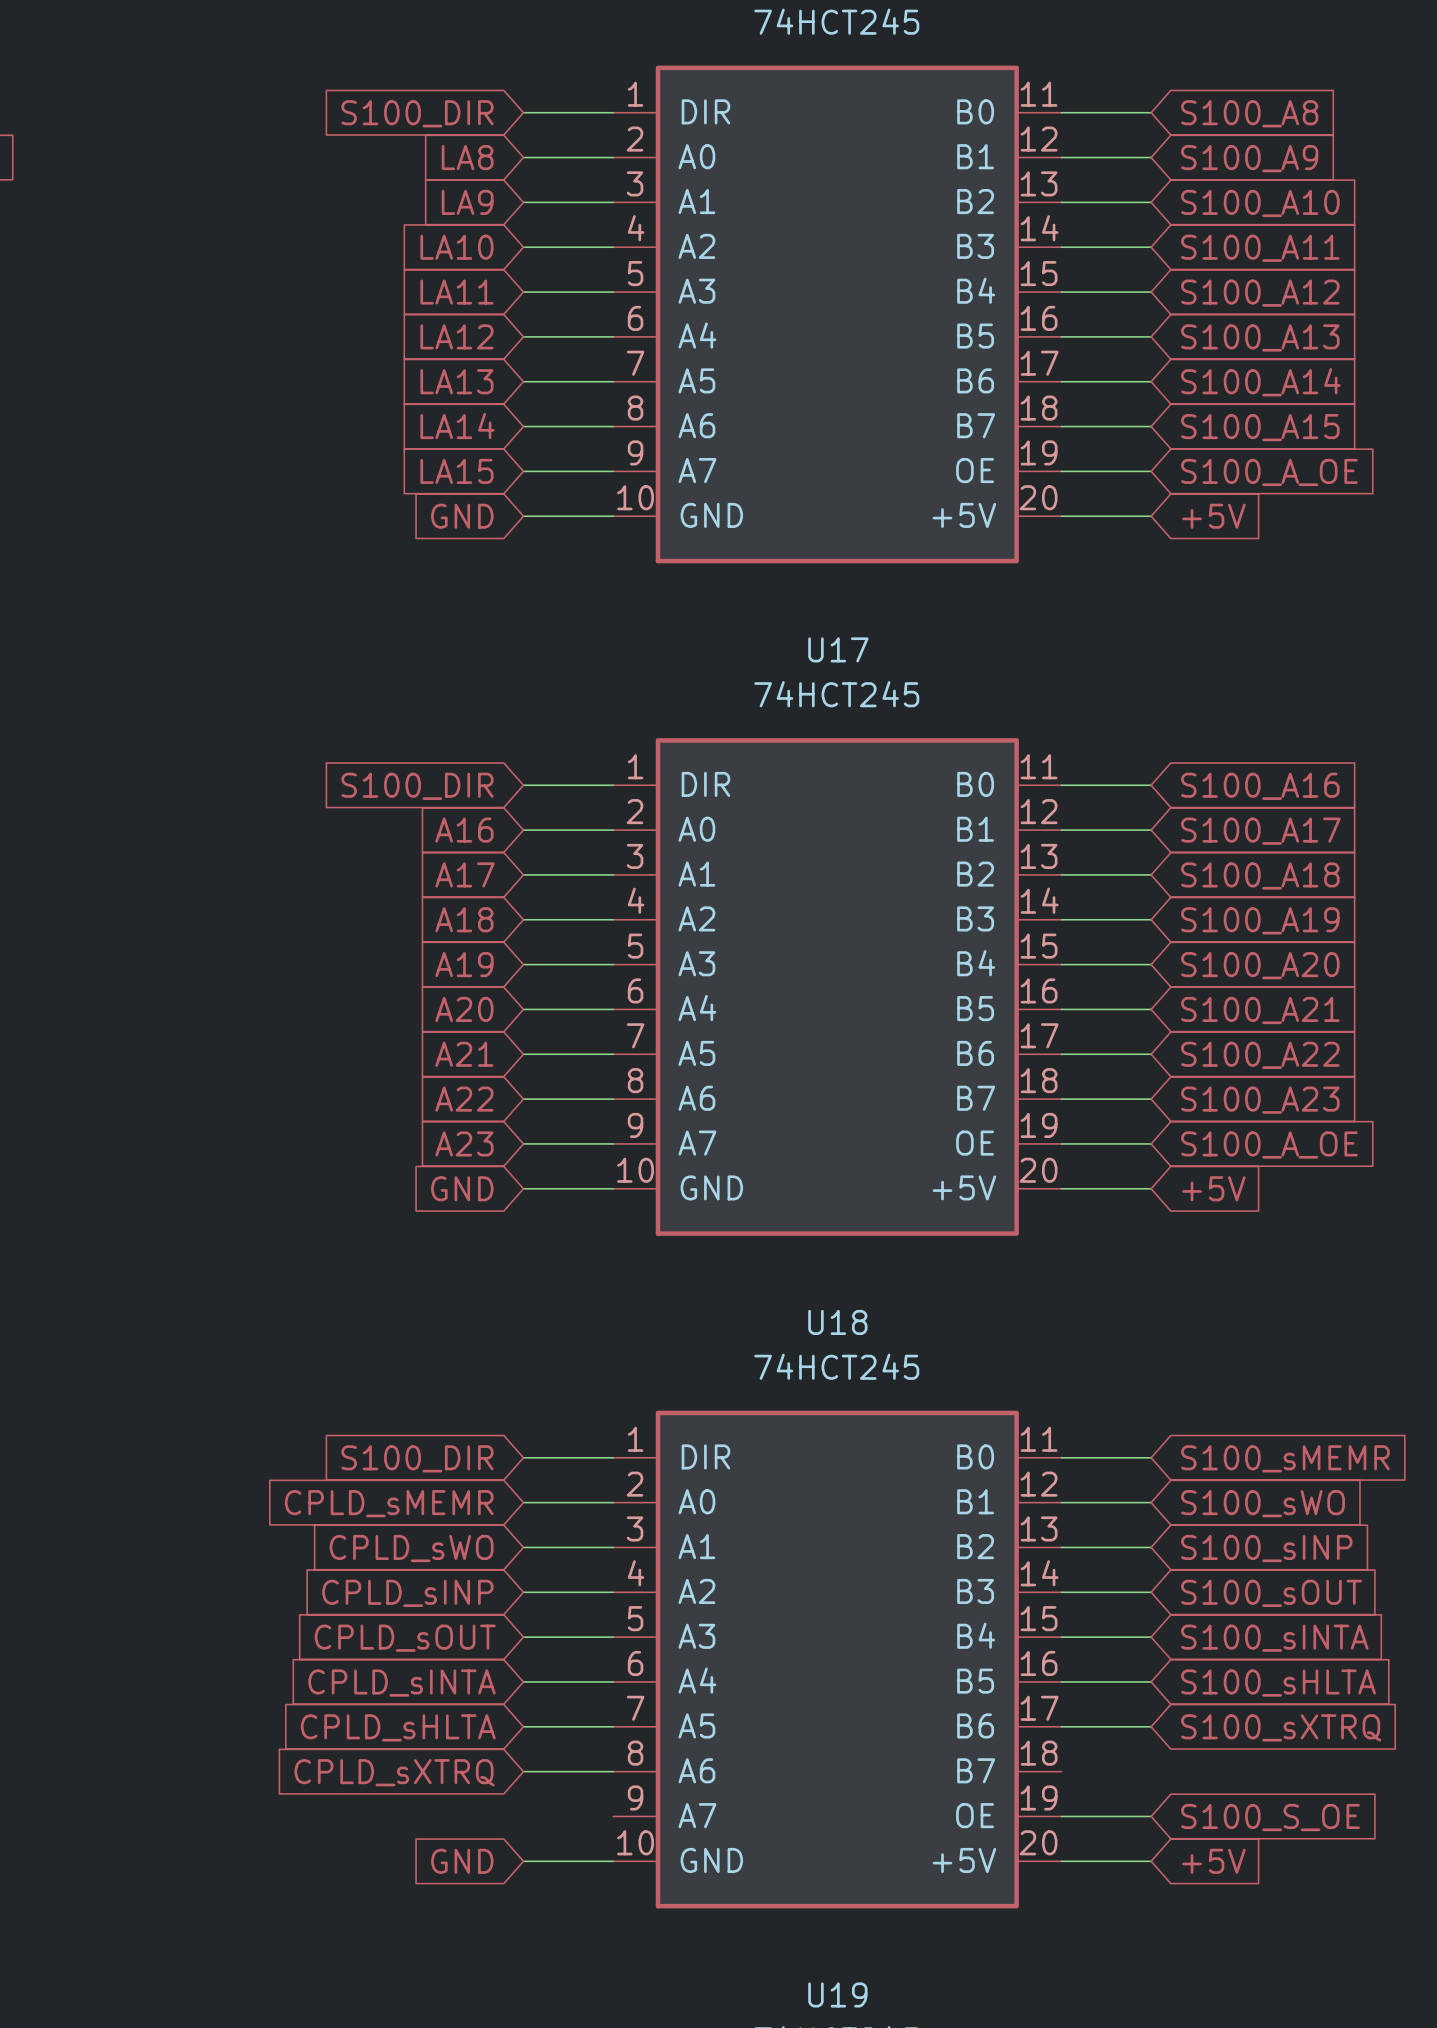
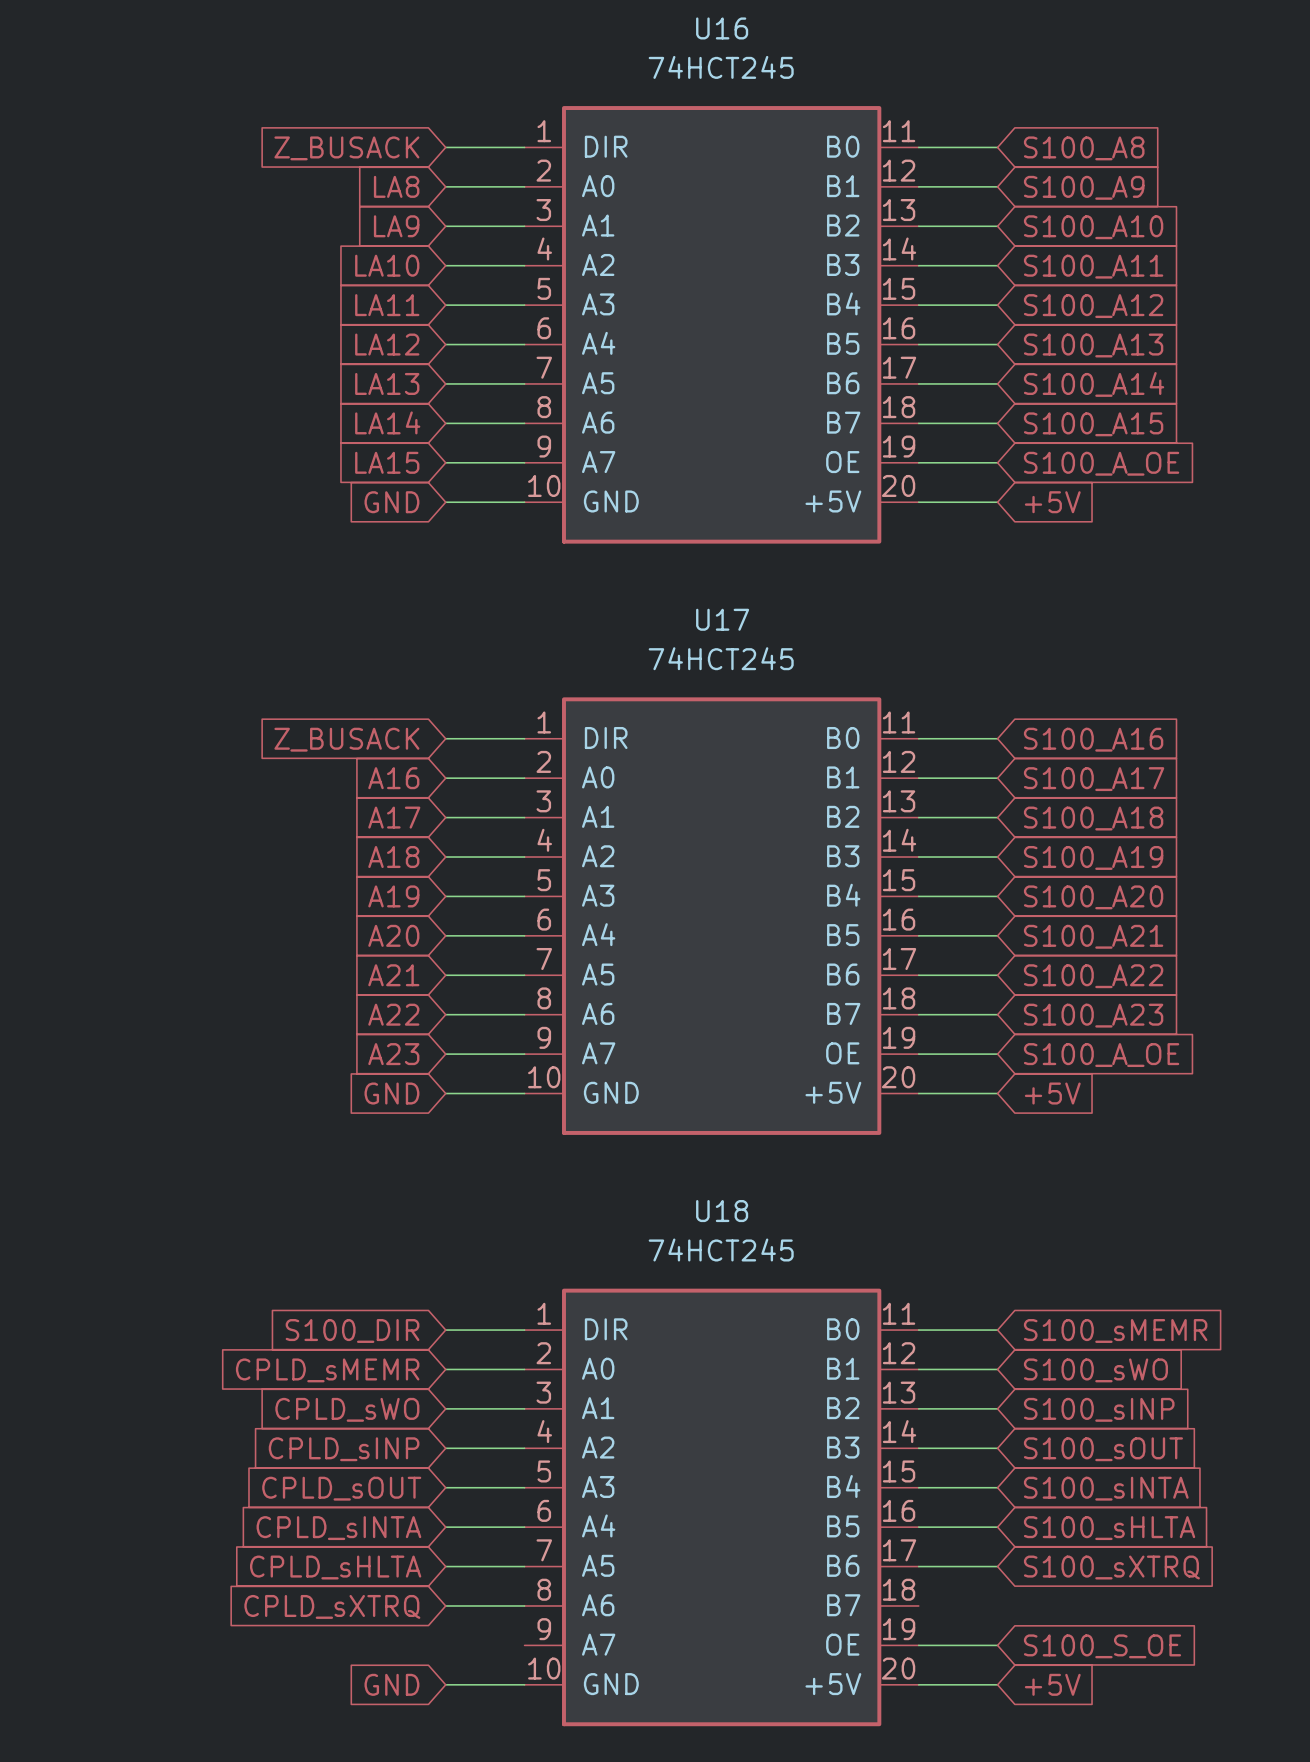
global label: S100_DIR (417, 113) -> Z_BUSACK (346, 148)
global label: S100_DIR (417, 786) -> Z_BUSACK (346, 739)

